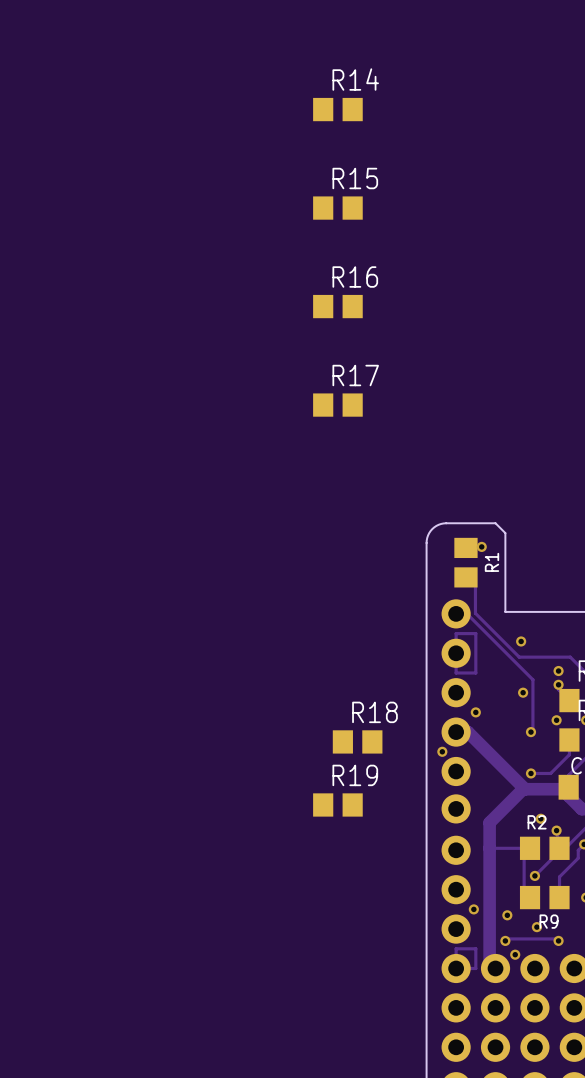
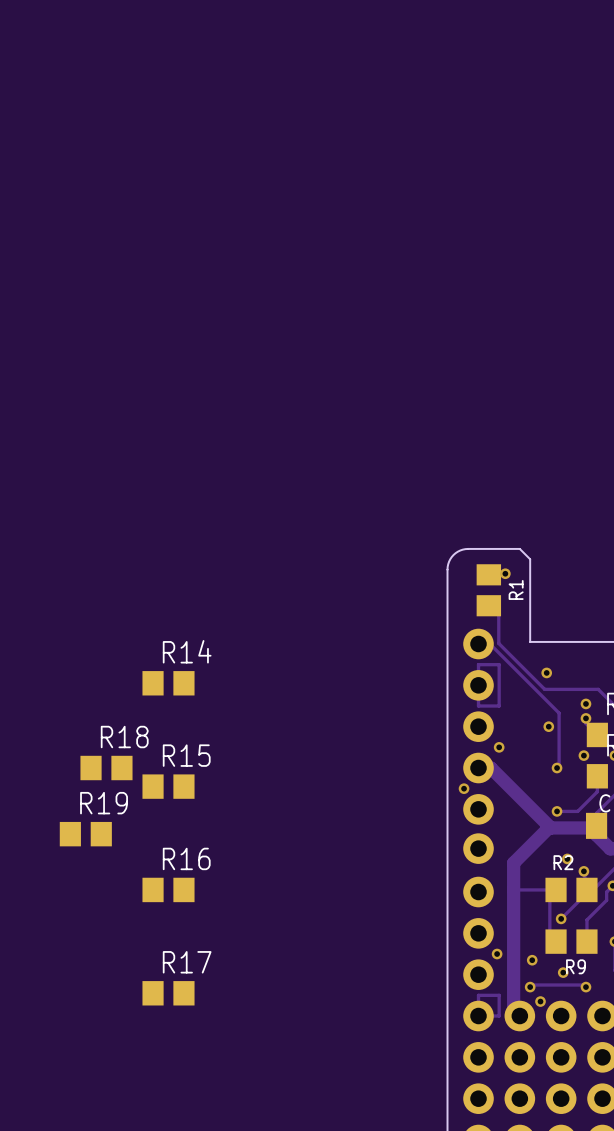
R14 position: (337, 109) -> (168, 683)
R15 position: (337, 208) -> (168, 786)
R16 position: (337, 306) -> (168, 889)
R17 position: (337, 405) -> (168, 993)
R18 position: (357, 741) -> (106, 768)
R19 position: (337, 804) -> (85, 834)

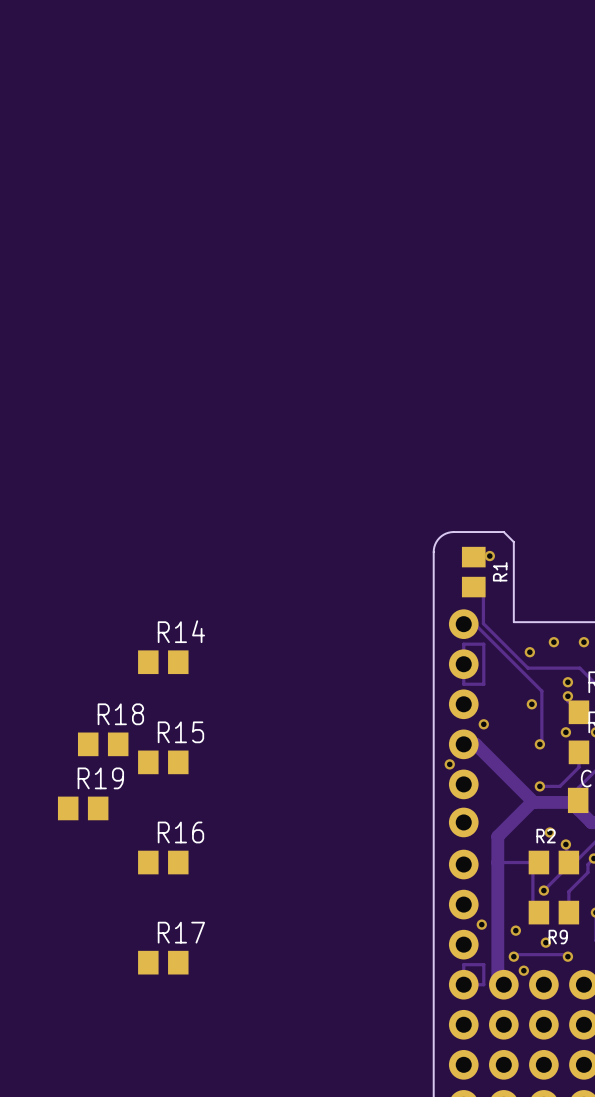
via: none -> (553, 642)
via: none -> (583, 642)

